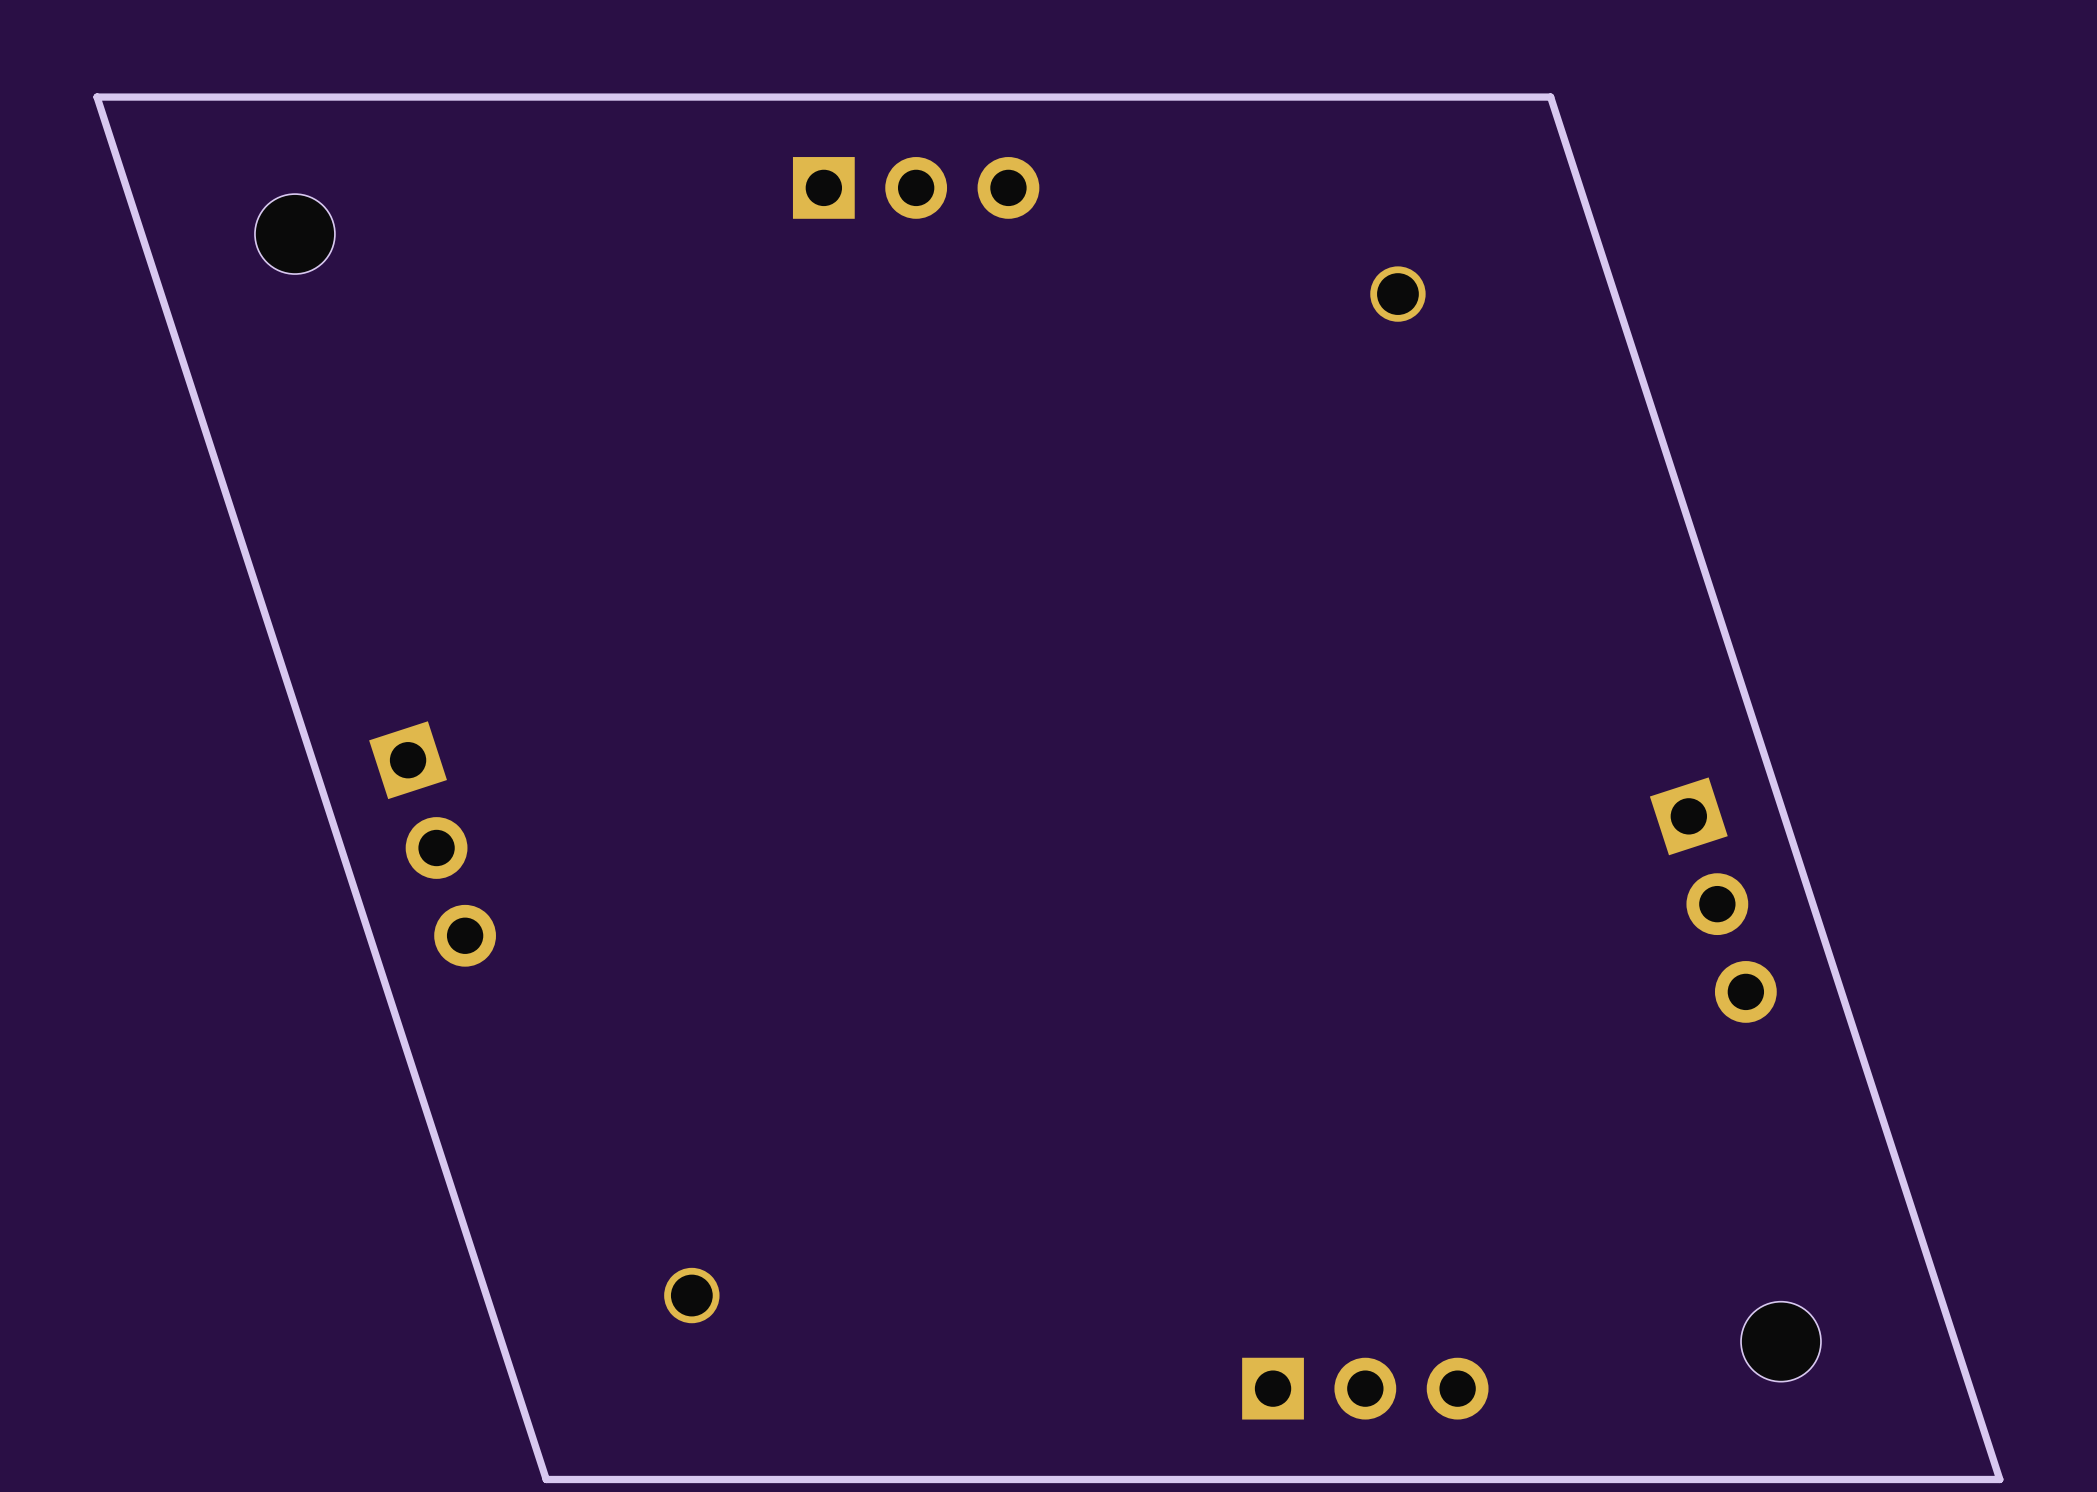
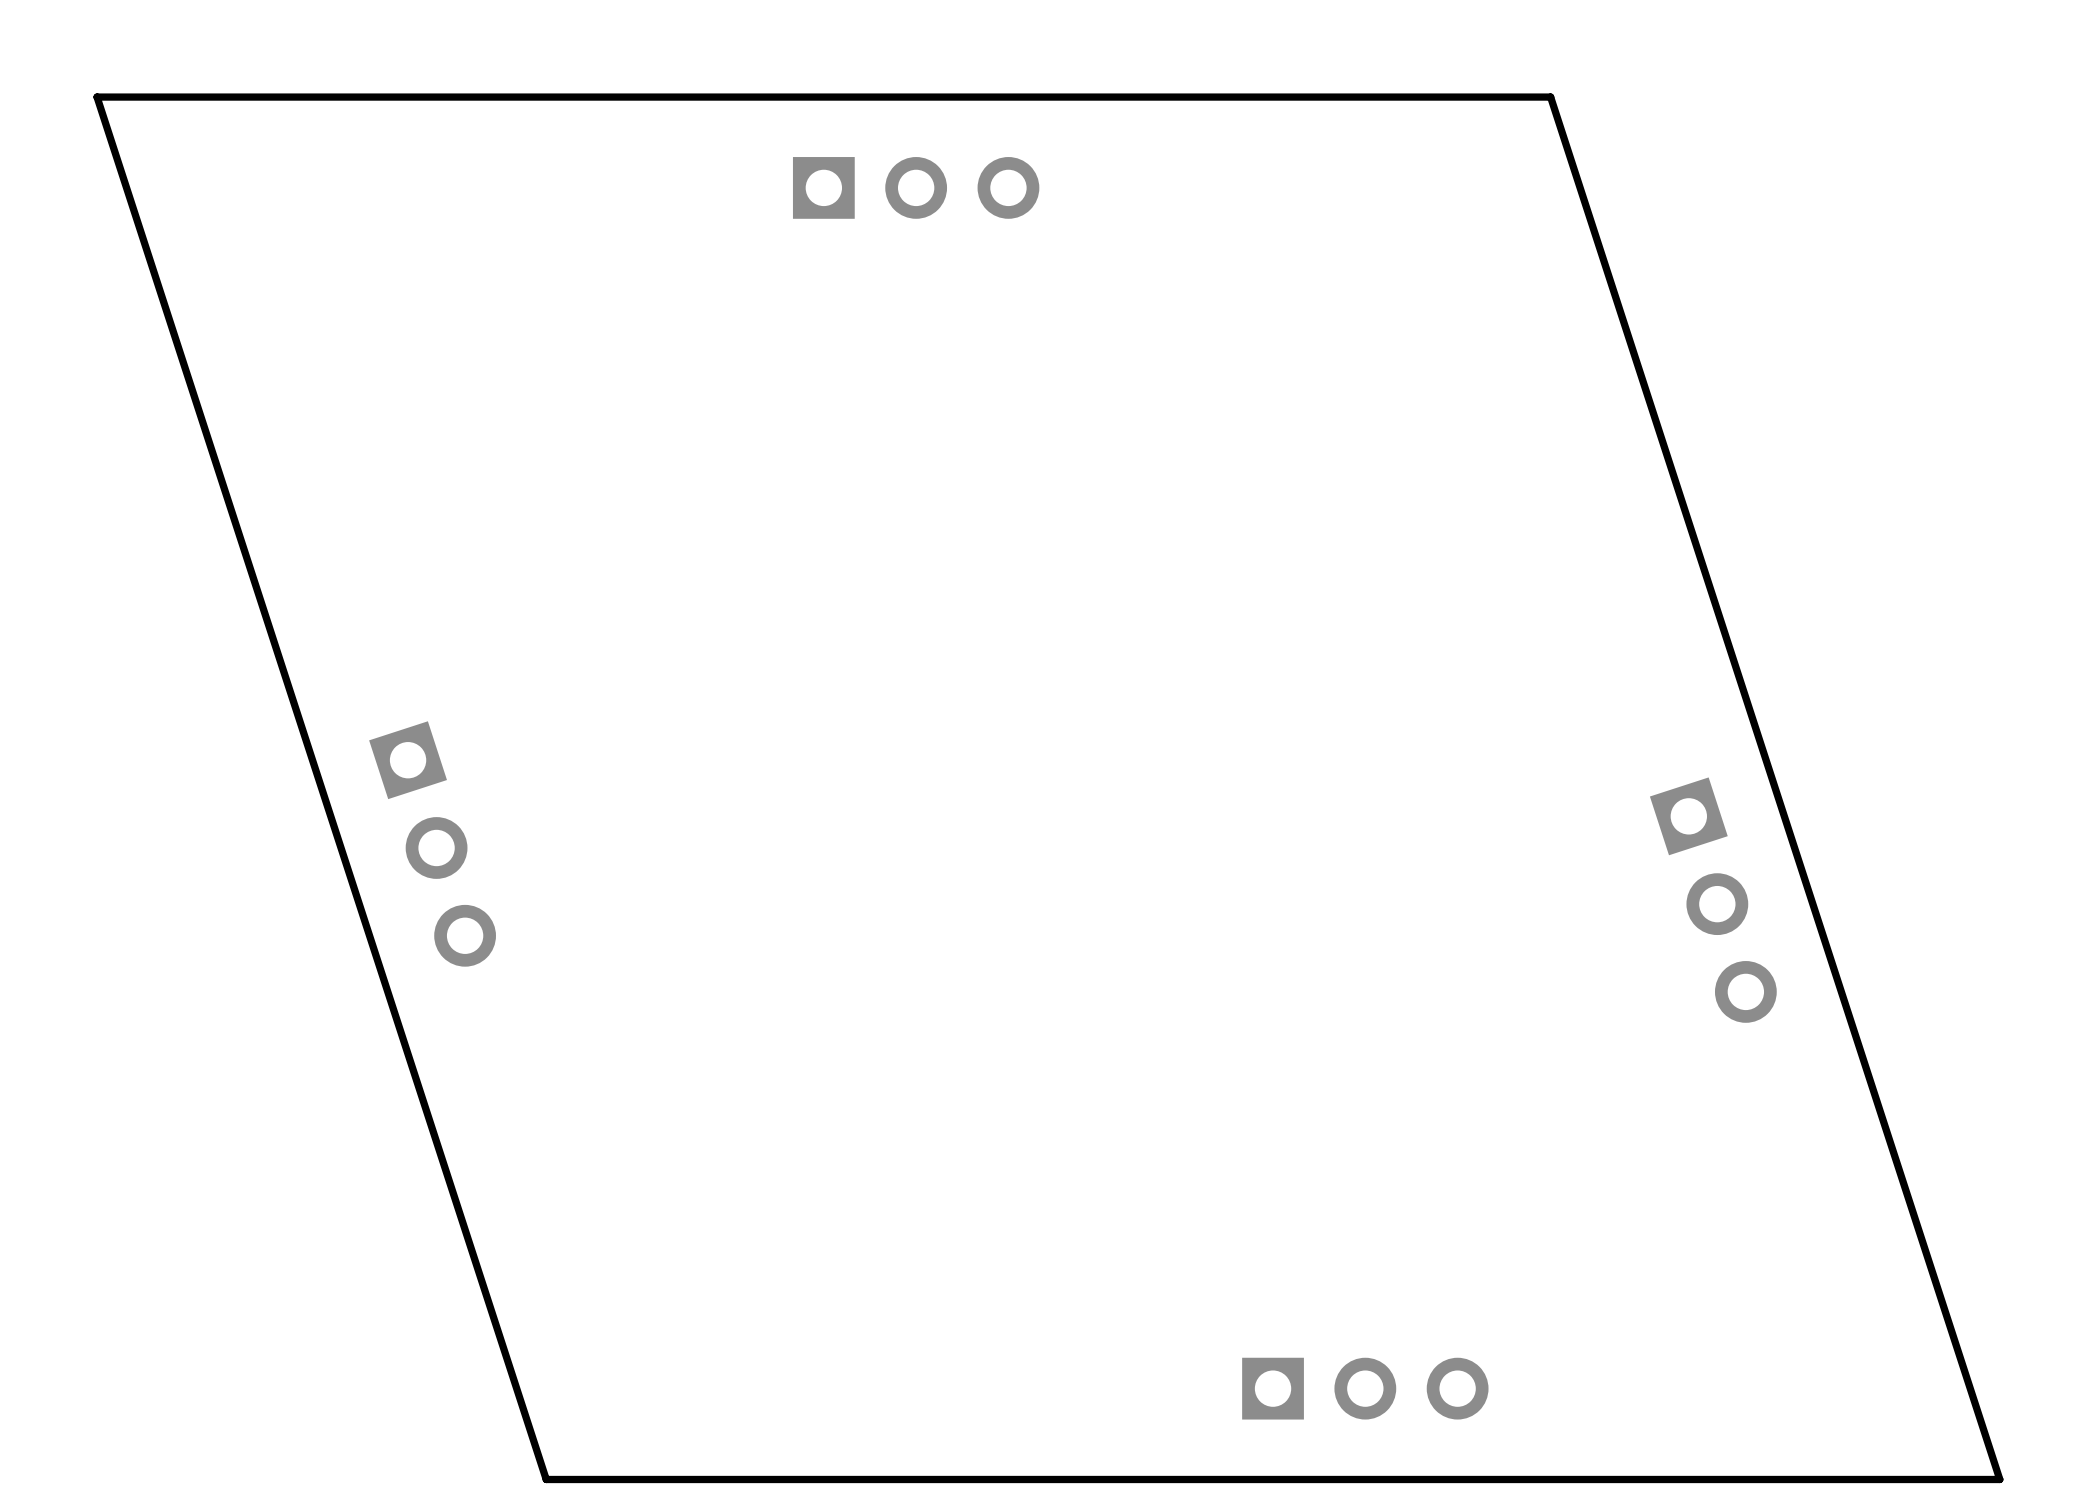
part: (294, 234) -> none
part: (1397, 294) -> none
part: (691, 1295) -> none
part: (1781, 1341) -> none

